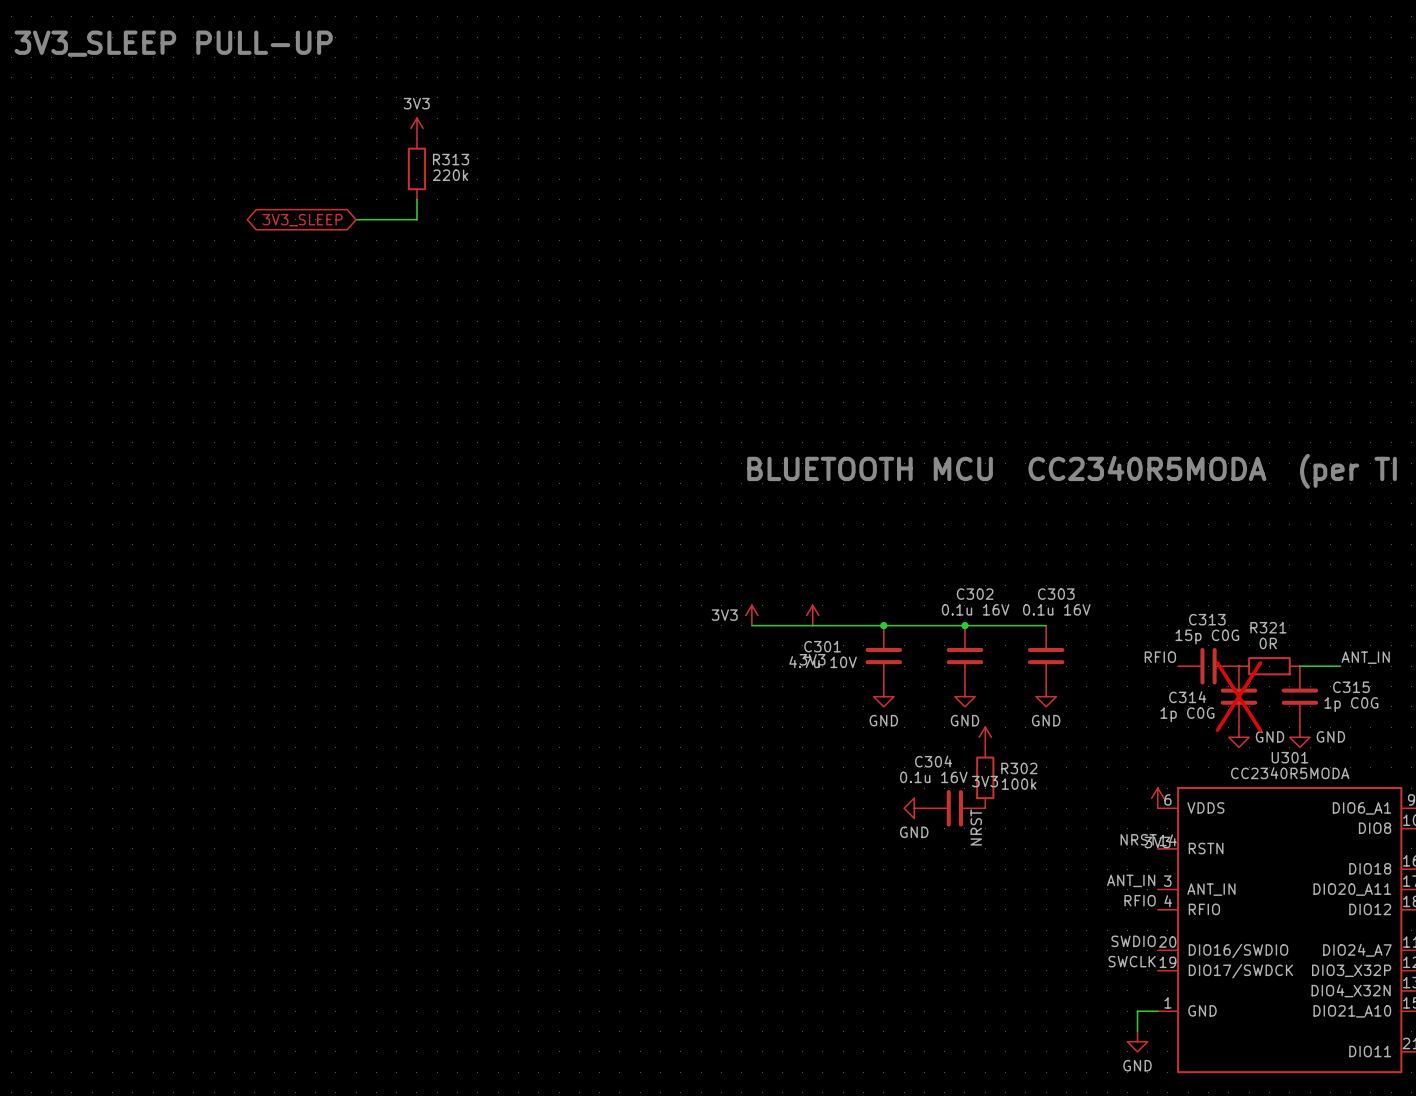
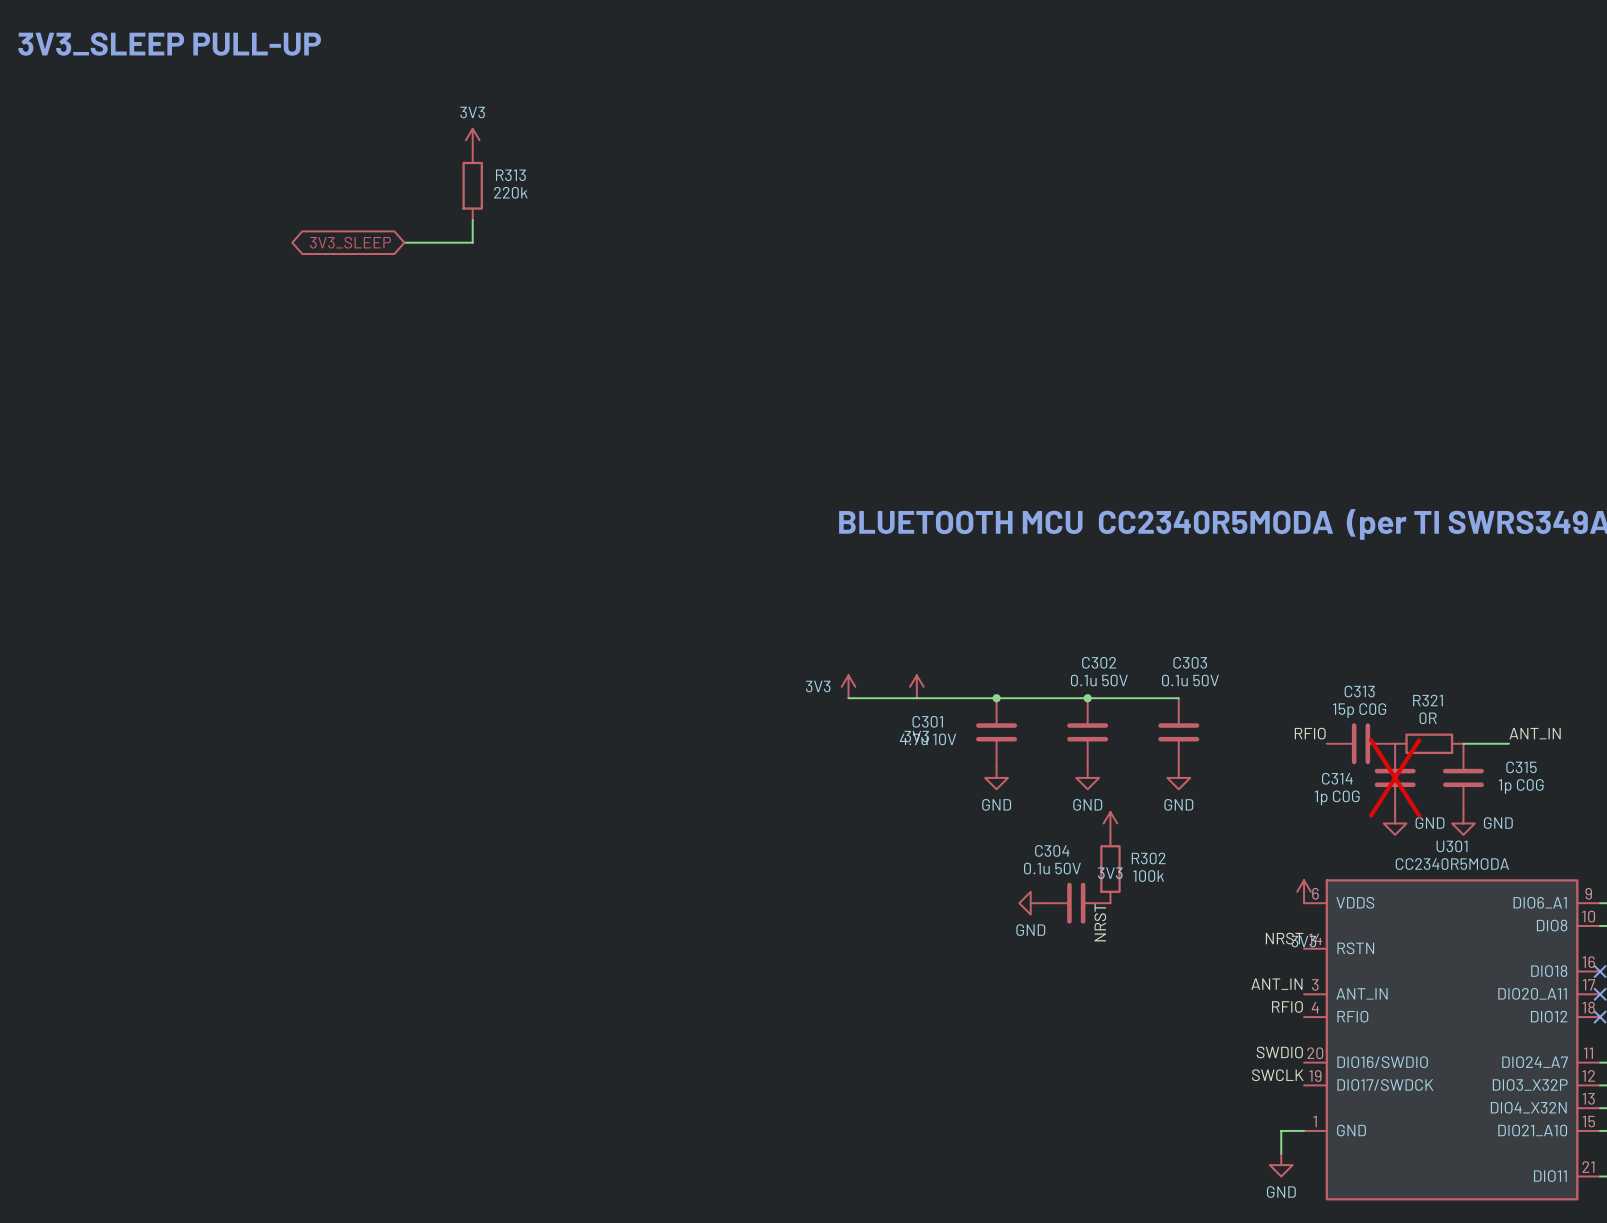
C302 value: 0.1u 16V (975, 609) -> 0.1u 50V (1099, 680)
C303 value: 0.1u 16V (1056, 609) -> 0.1u 50V (1190, 680)
C304 value: 0.1u 16V (933, 777) -> 0.1u 50V (1052, 868)

